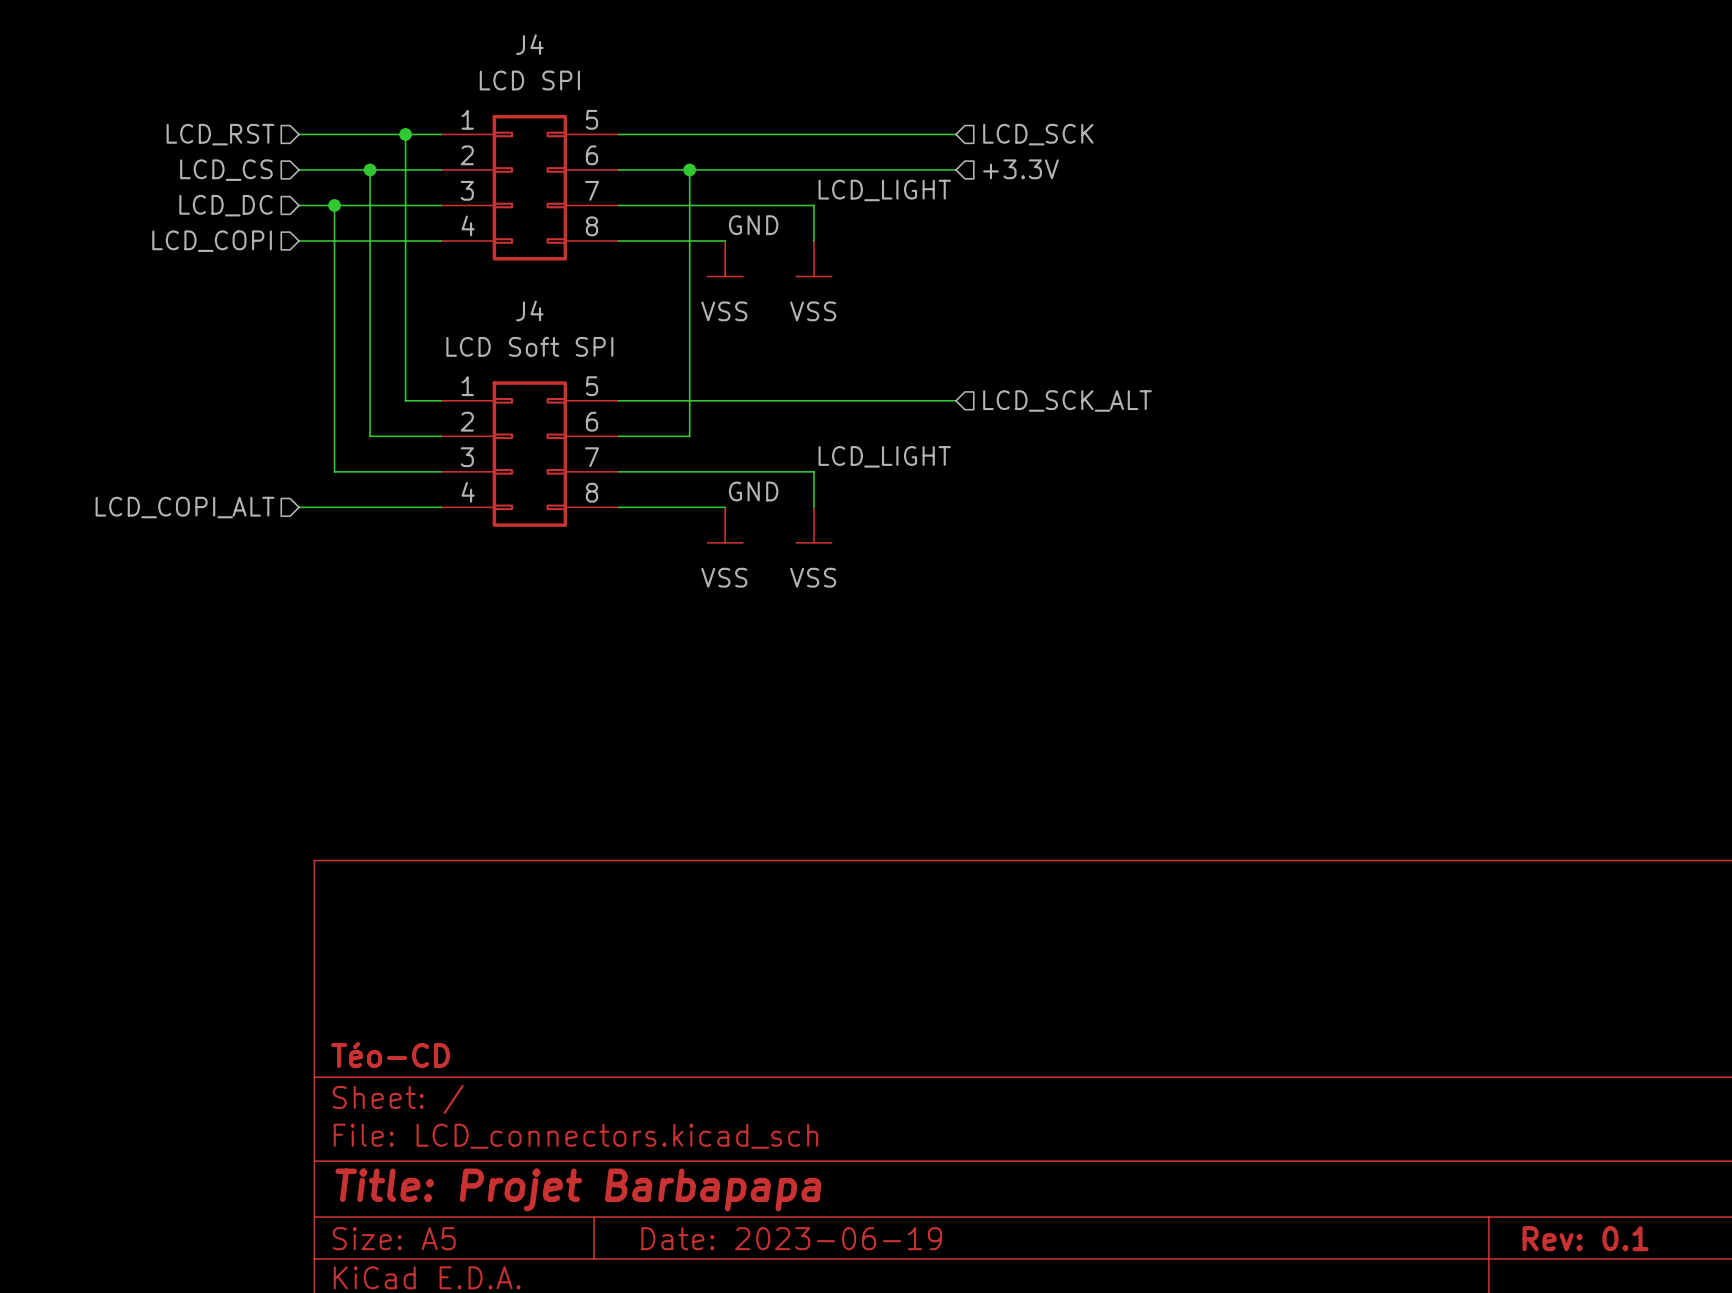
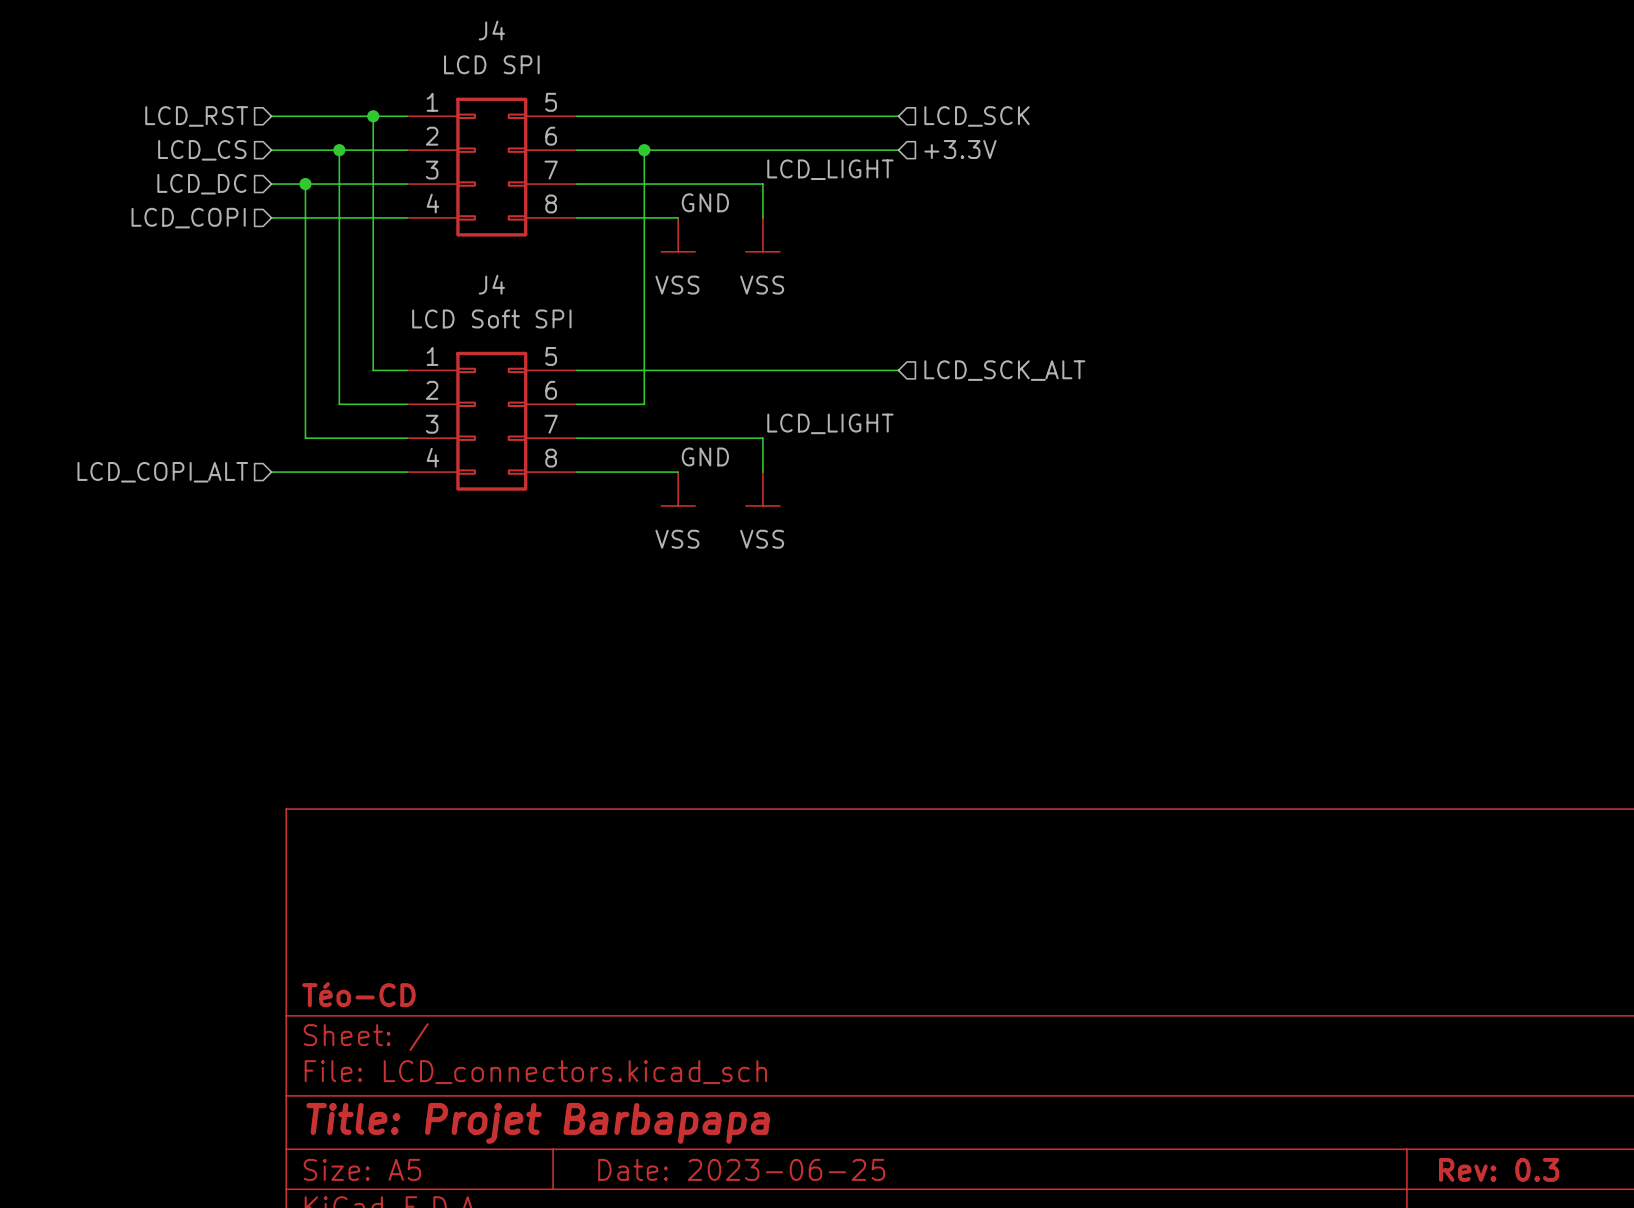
title block: Date: 2023-06-19 (791, 1238) -> Date: 2023-06-25 (741, 1169)
title block: Rev: 0.1 (1585, 1238) -> Rev: 0.3 (1499, 1169)

